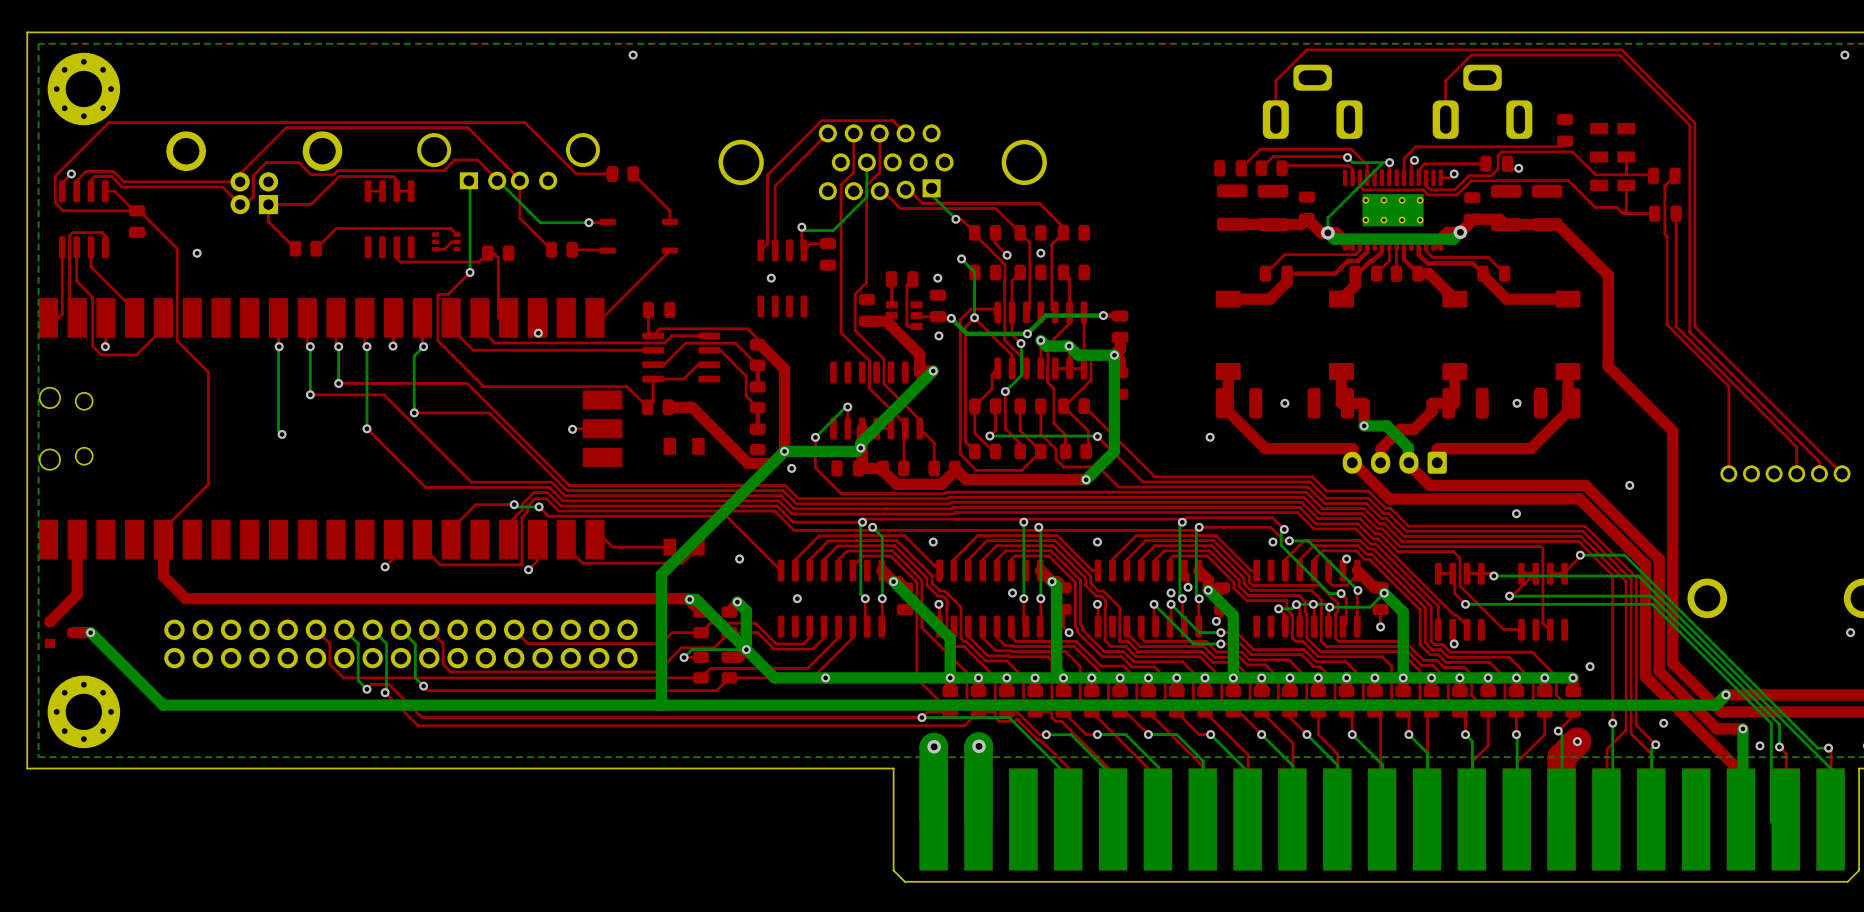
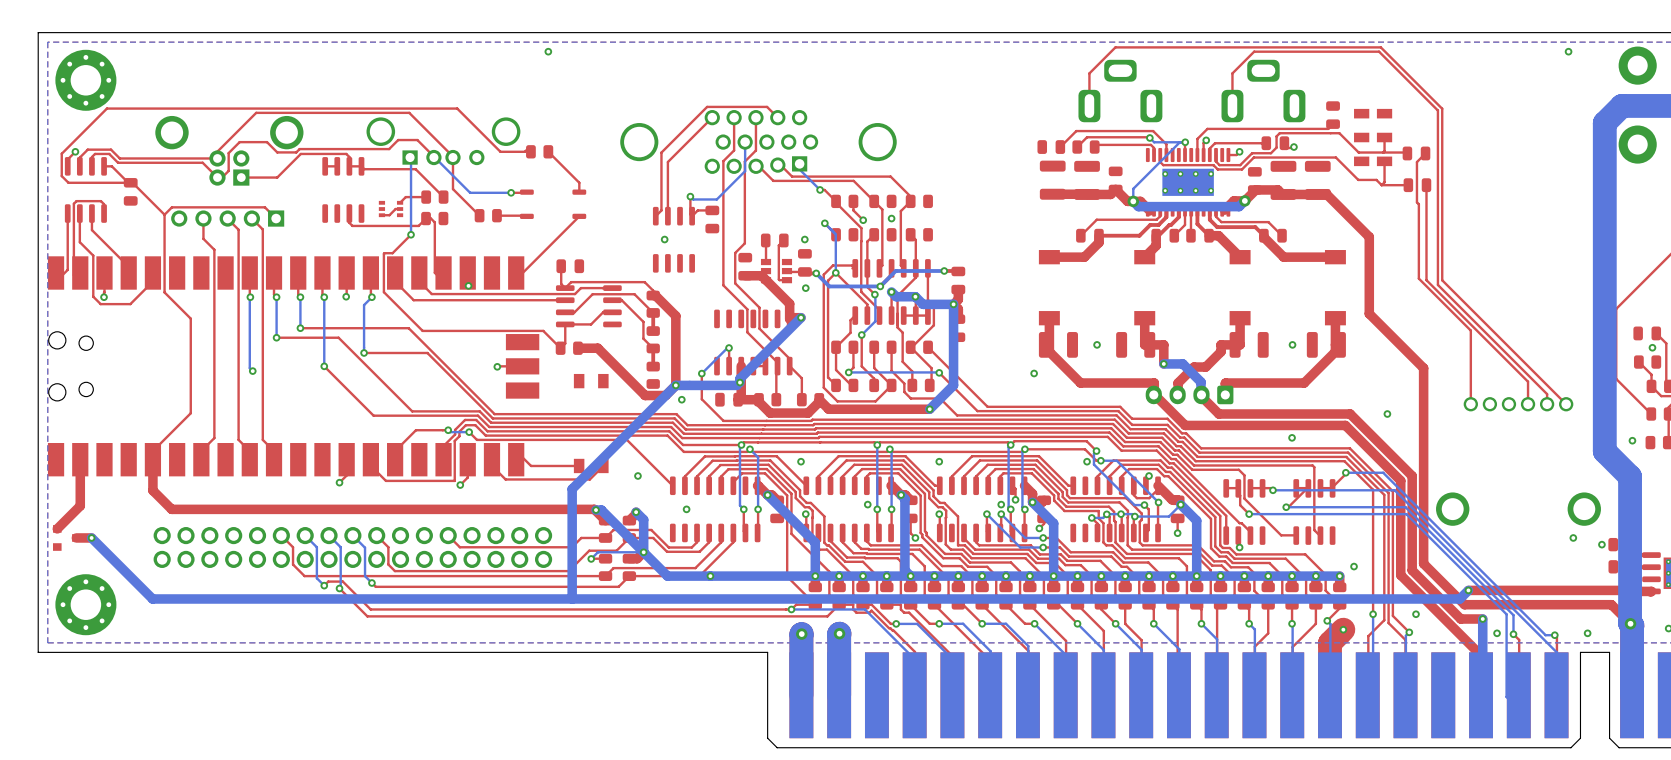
top track: none -> (361, 166) (364, 169) (415, 169) (443, 197)
top track: (268, 204) (268, 221) (295, 248) -> none
top track: (457, 234) (451, 228) (336, 228) (316, 248) -> (400, 202) (405, 197) (426, 197)
top track: none -> (164, 214) (171, 207) (264, 207) (276, 218)
part position: (305, 248) -> (434, 197)
top track: none -> (203, 218) (203, 238) (214, 249) (214, 438) (201, 451)
top track: none -> (227, 218) (238, 229) (238, 439) (249, 451)
part: none -> (227, 218)
top track: none -> (251, 218) (262, 229) (262, 439) (274, 451)

